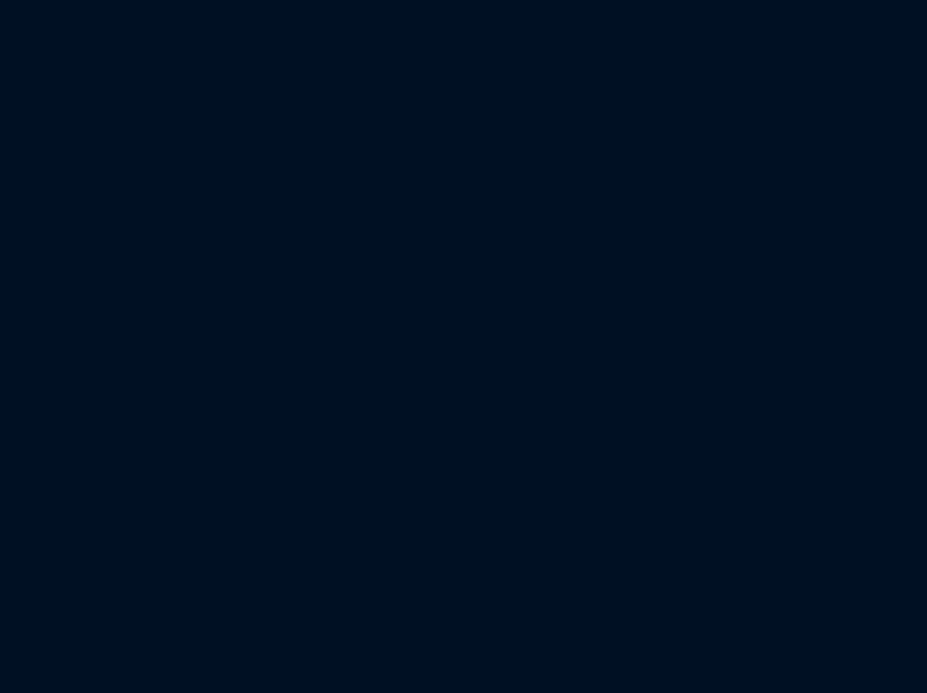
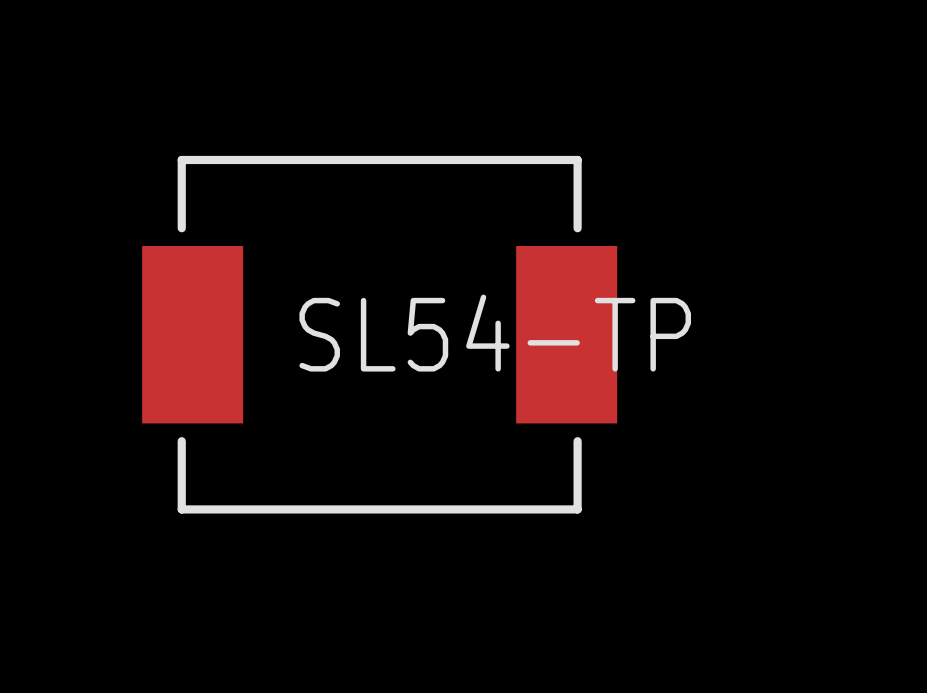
part: none -> SL54-TP (379, 334)

